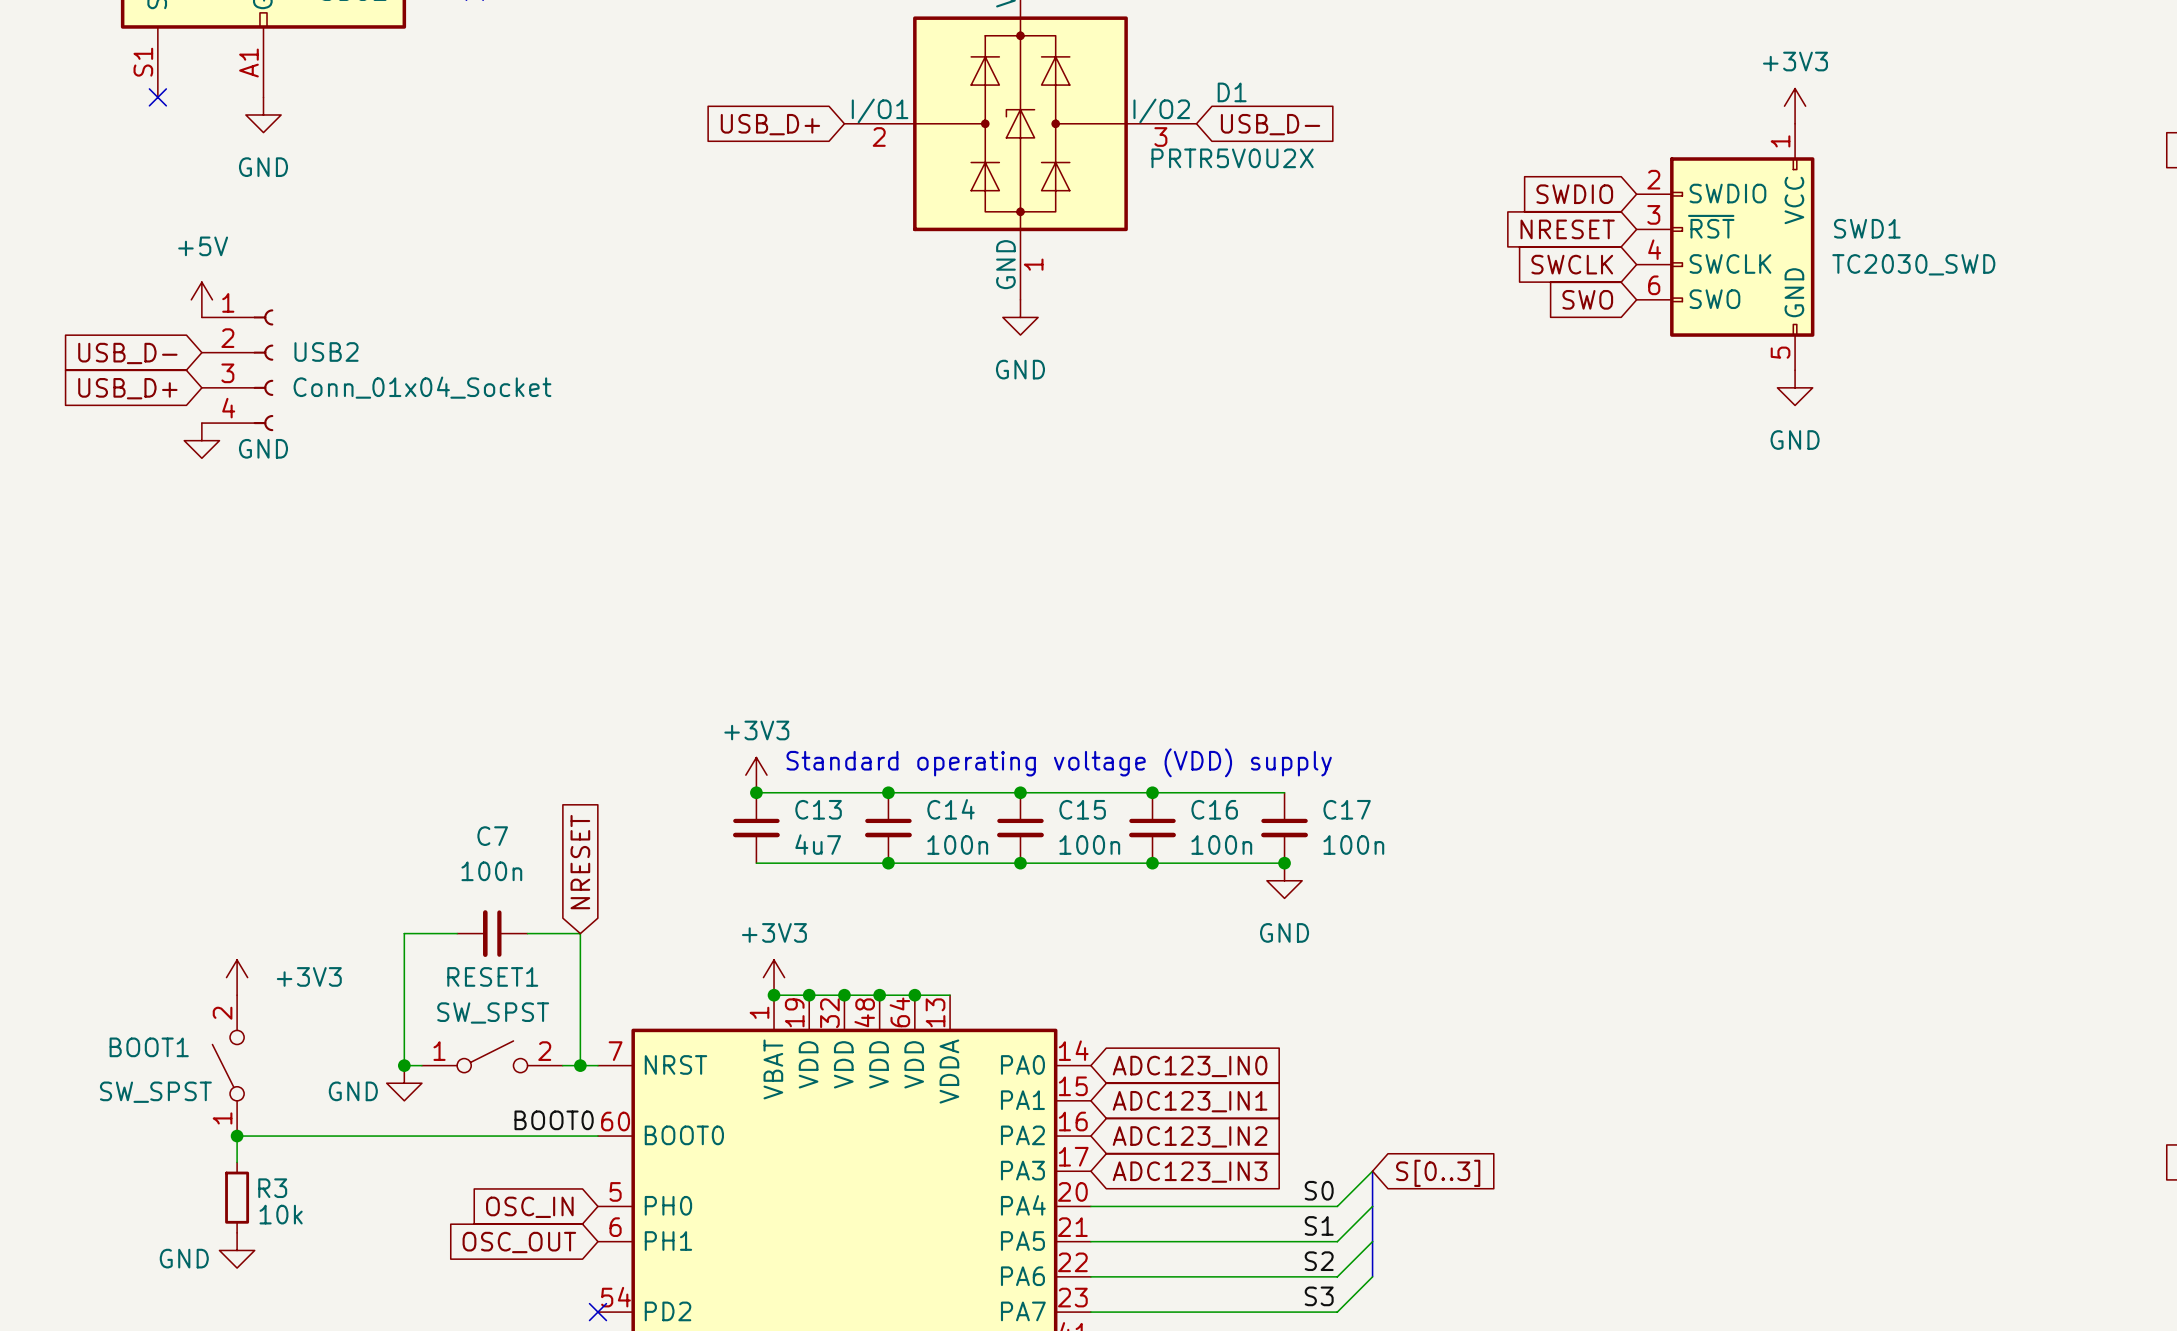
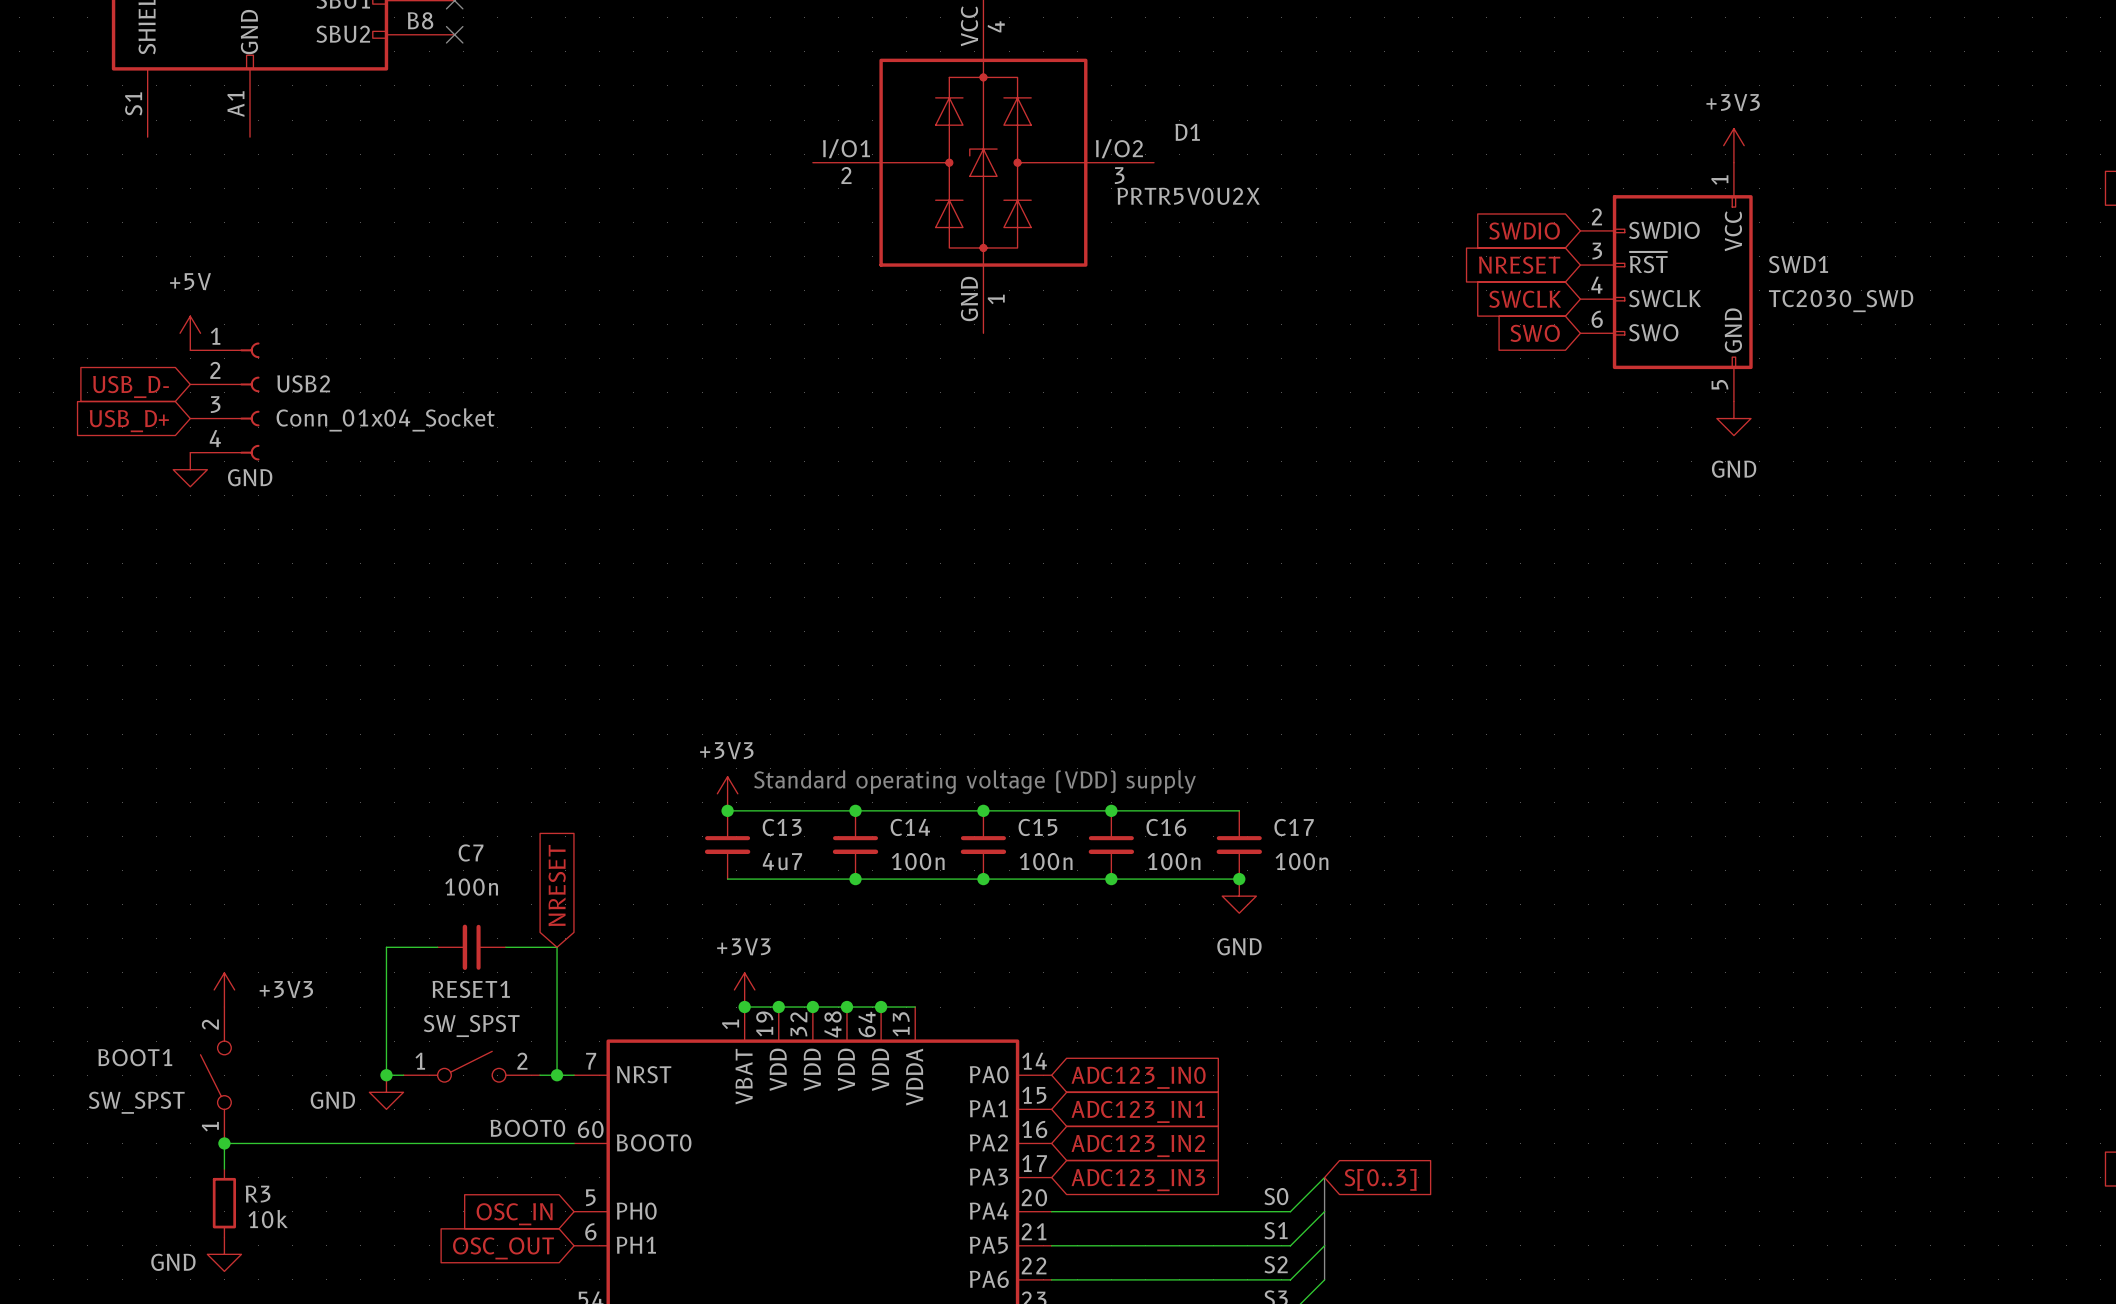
no-connect mark: (157, 97) -> none
power symbol: GND (263, 114) -> none
global label: USB_D+ (770, 124) -> none
global label: USB_D- (1270, 124) -> none
power symbol: GND (1020, 317) -> none

